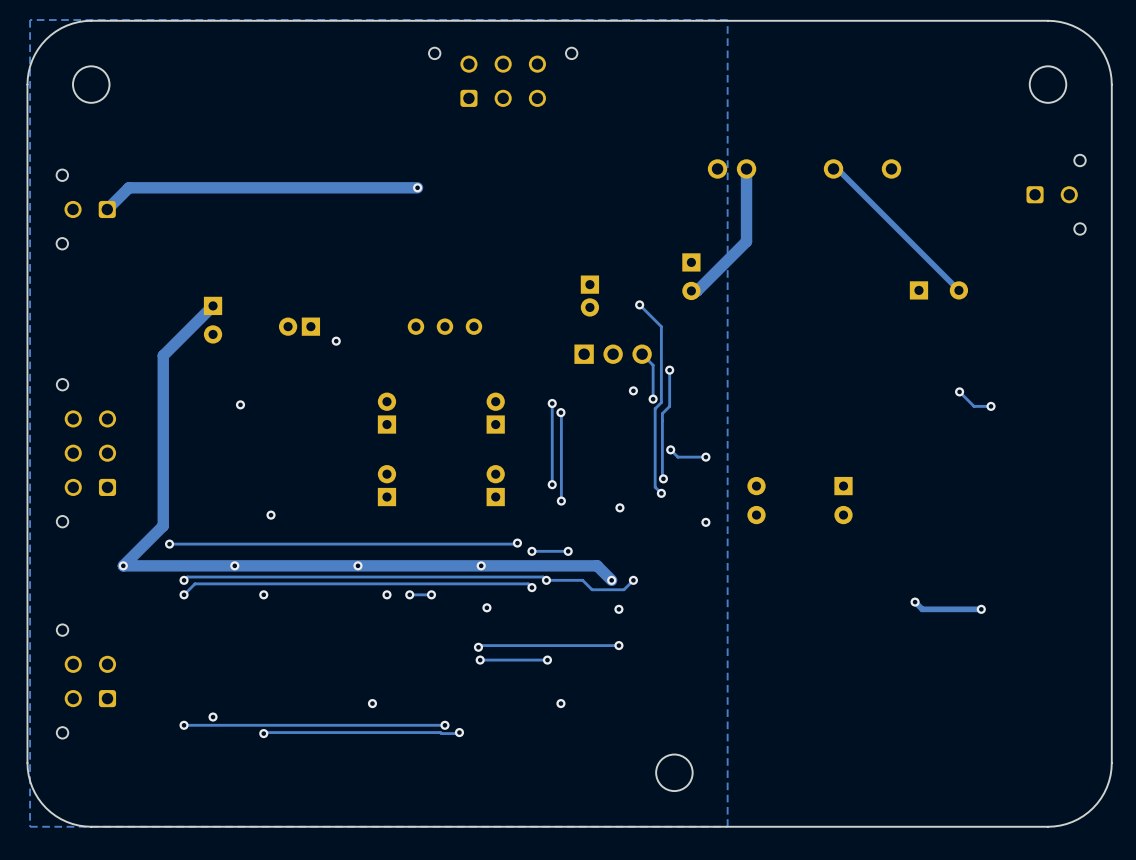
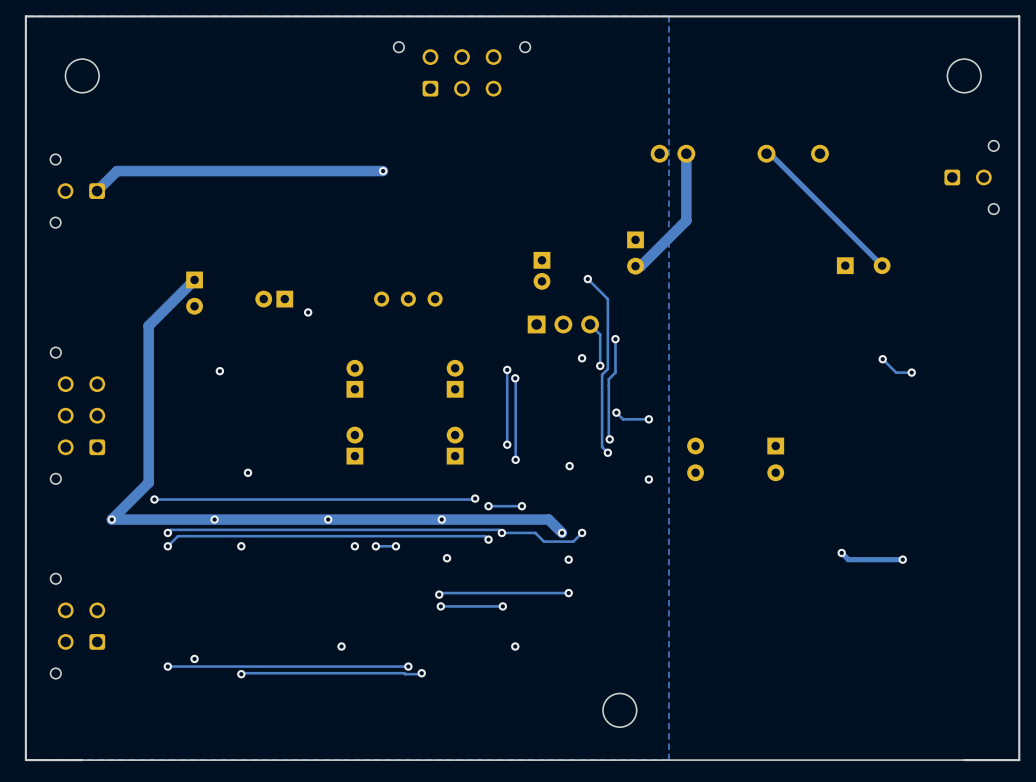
board edge: (1048, 826) (1072, 821) (1093, 808) (1106, 787) (1111, 762) (1111, 78) (1104, 54) (1088, 35) (1066, 23) (1048, 20) (91, 20) (66, 25) (50, 35) (35, 54) (30, 66) (27, 84) (27, 769) (35, 793) (50, 812) (72, 824) (91, 826) -> (964, 760) (1019, 760) (1019, 16) (25, 16) (25, 760) (82, 760)

